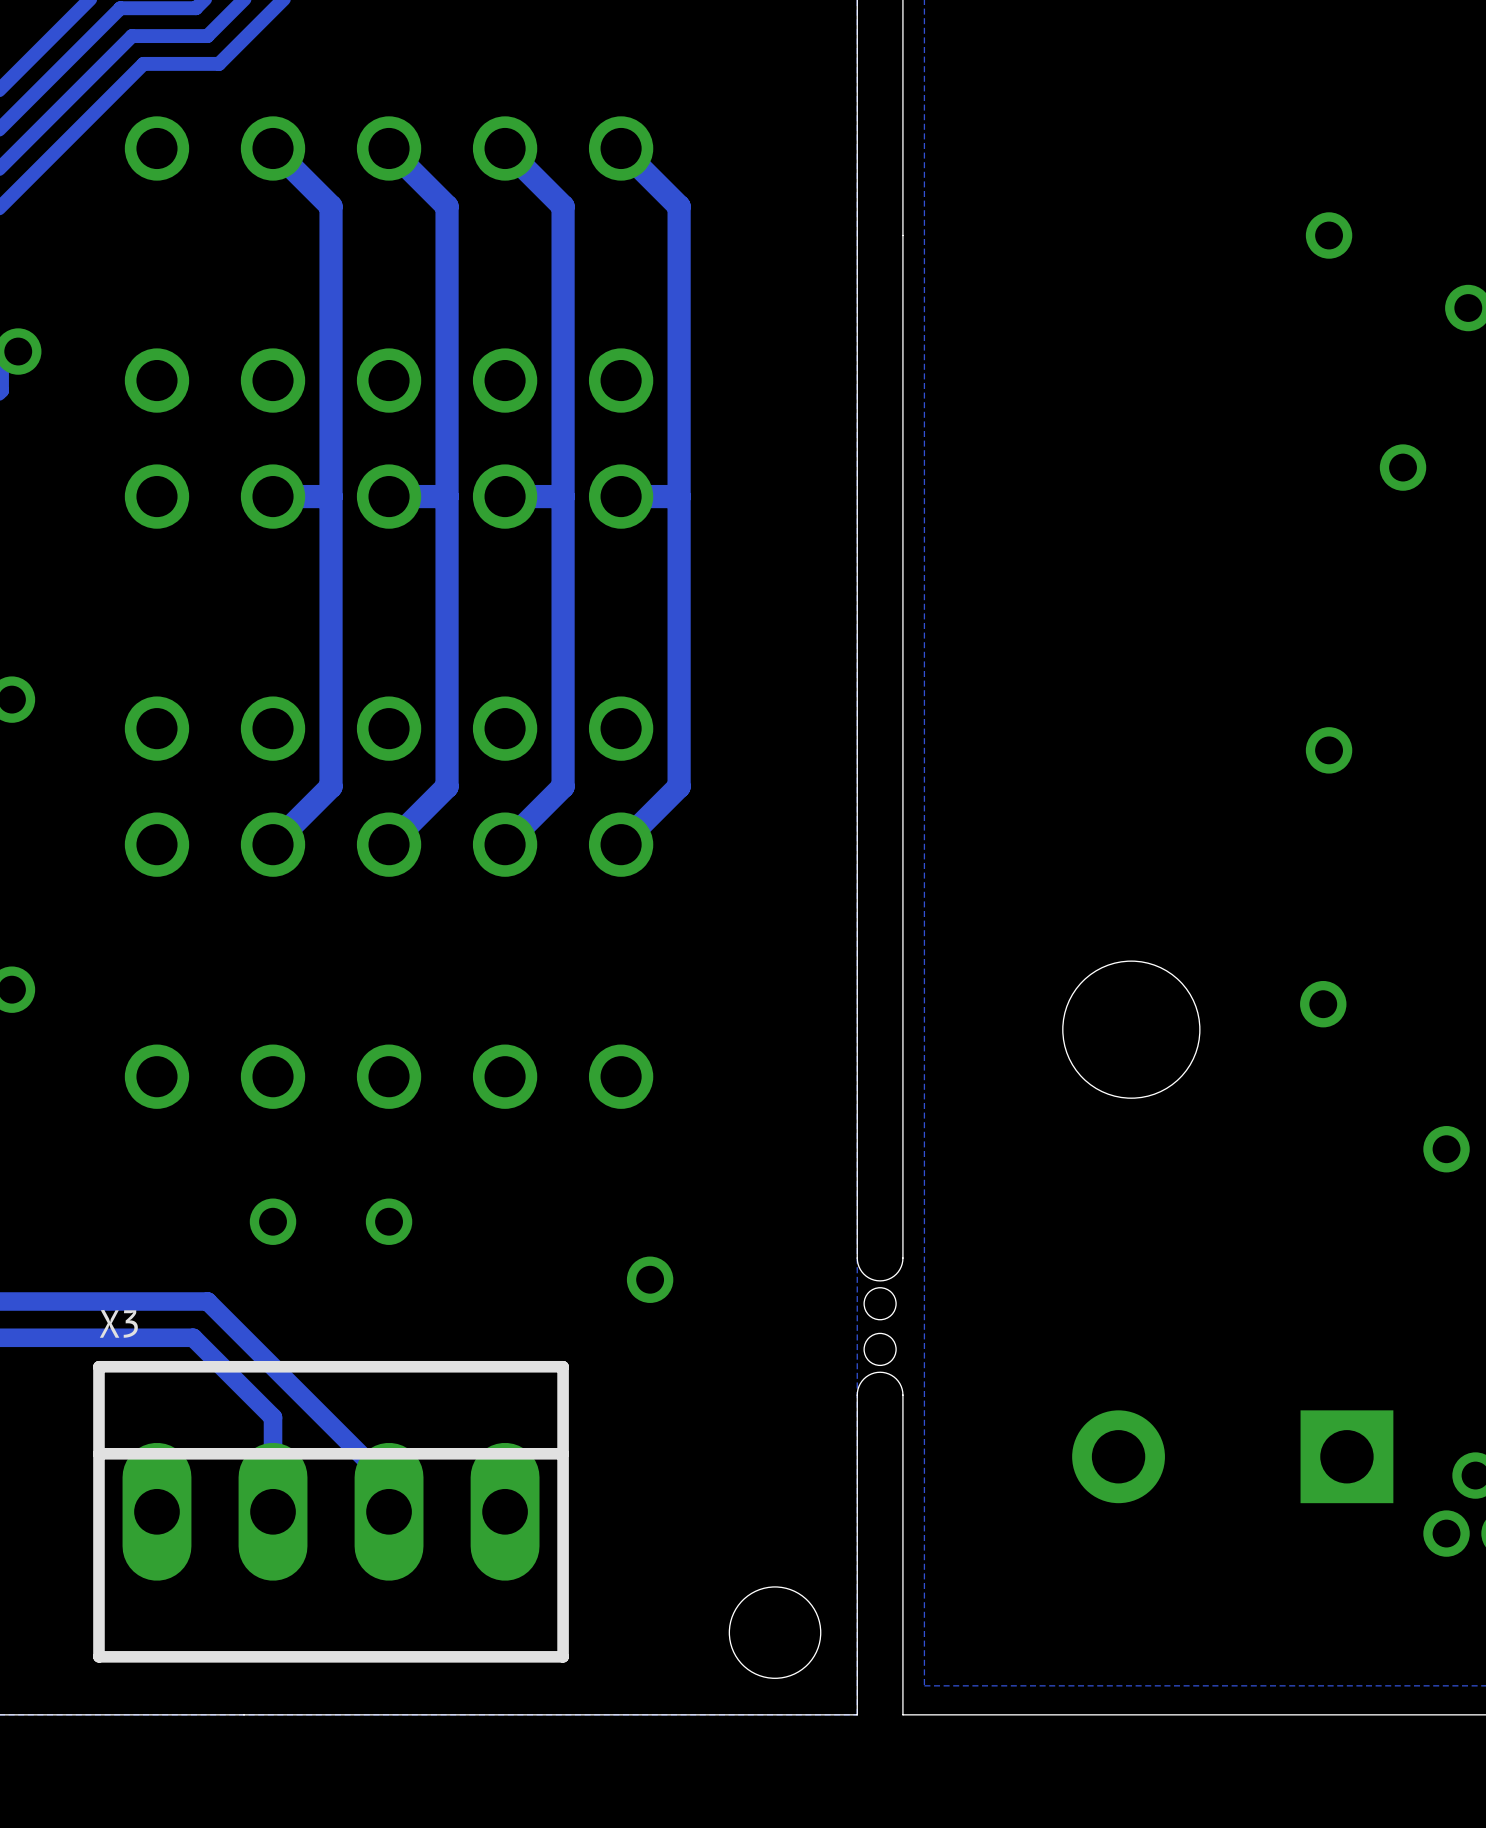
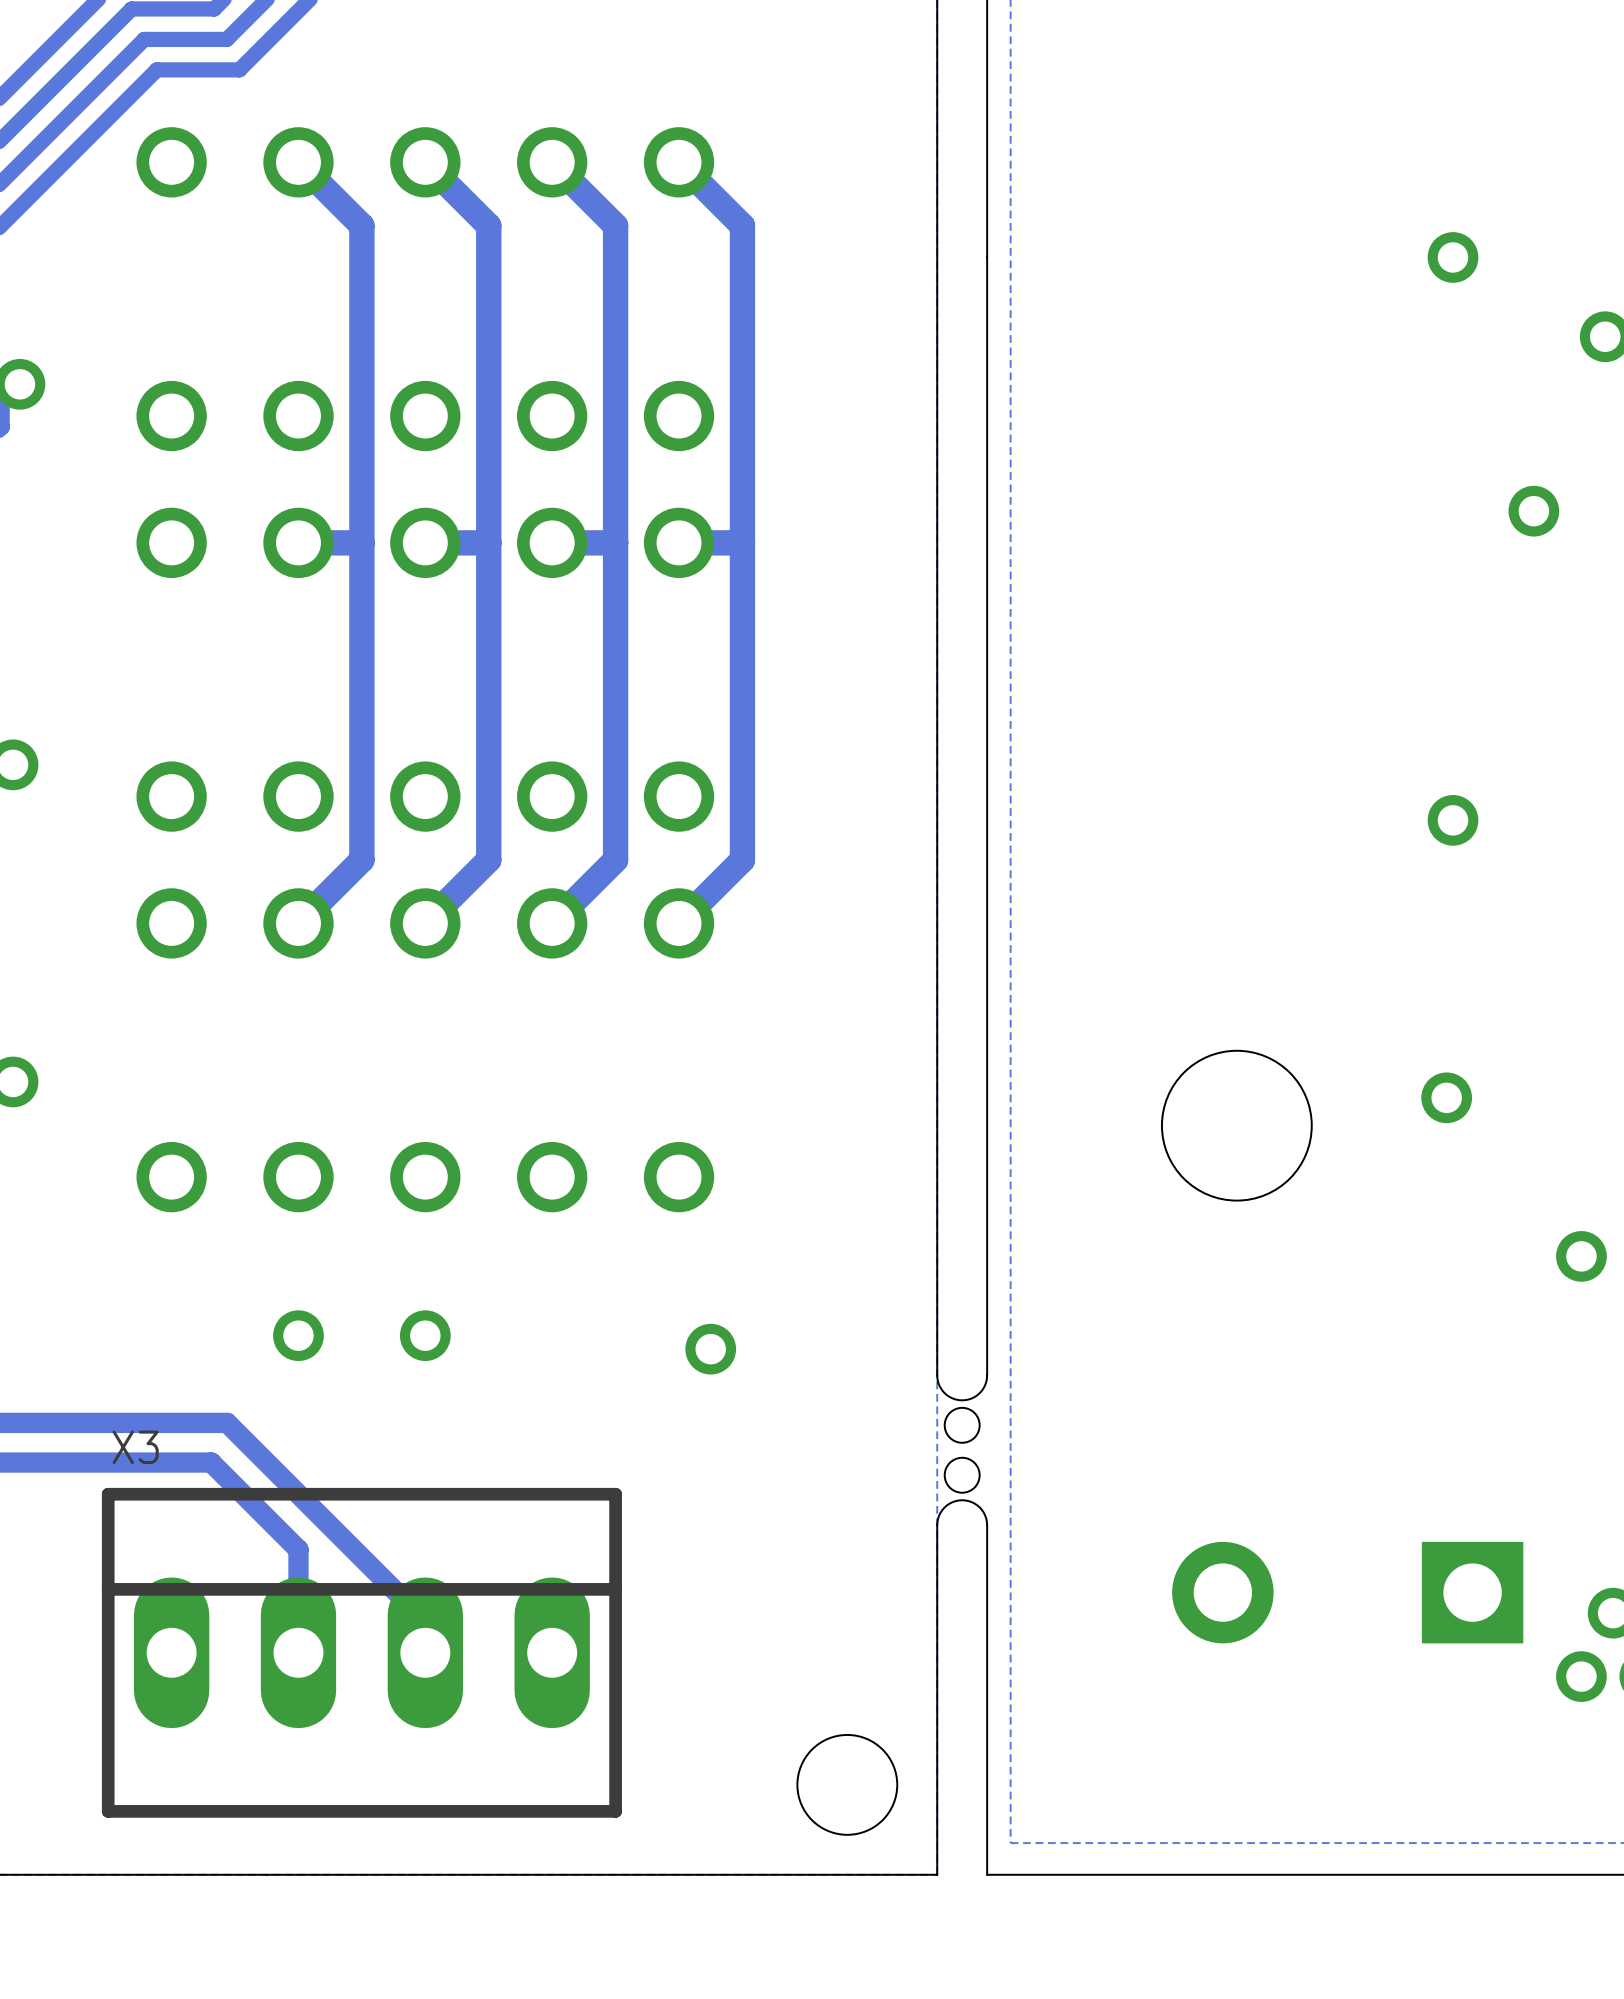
via position: (650, 1279) -> (710, 1349)

